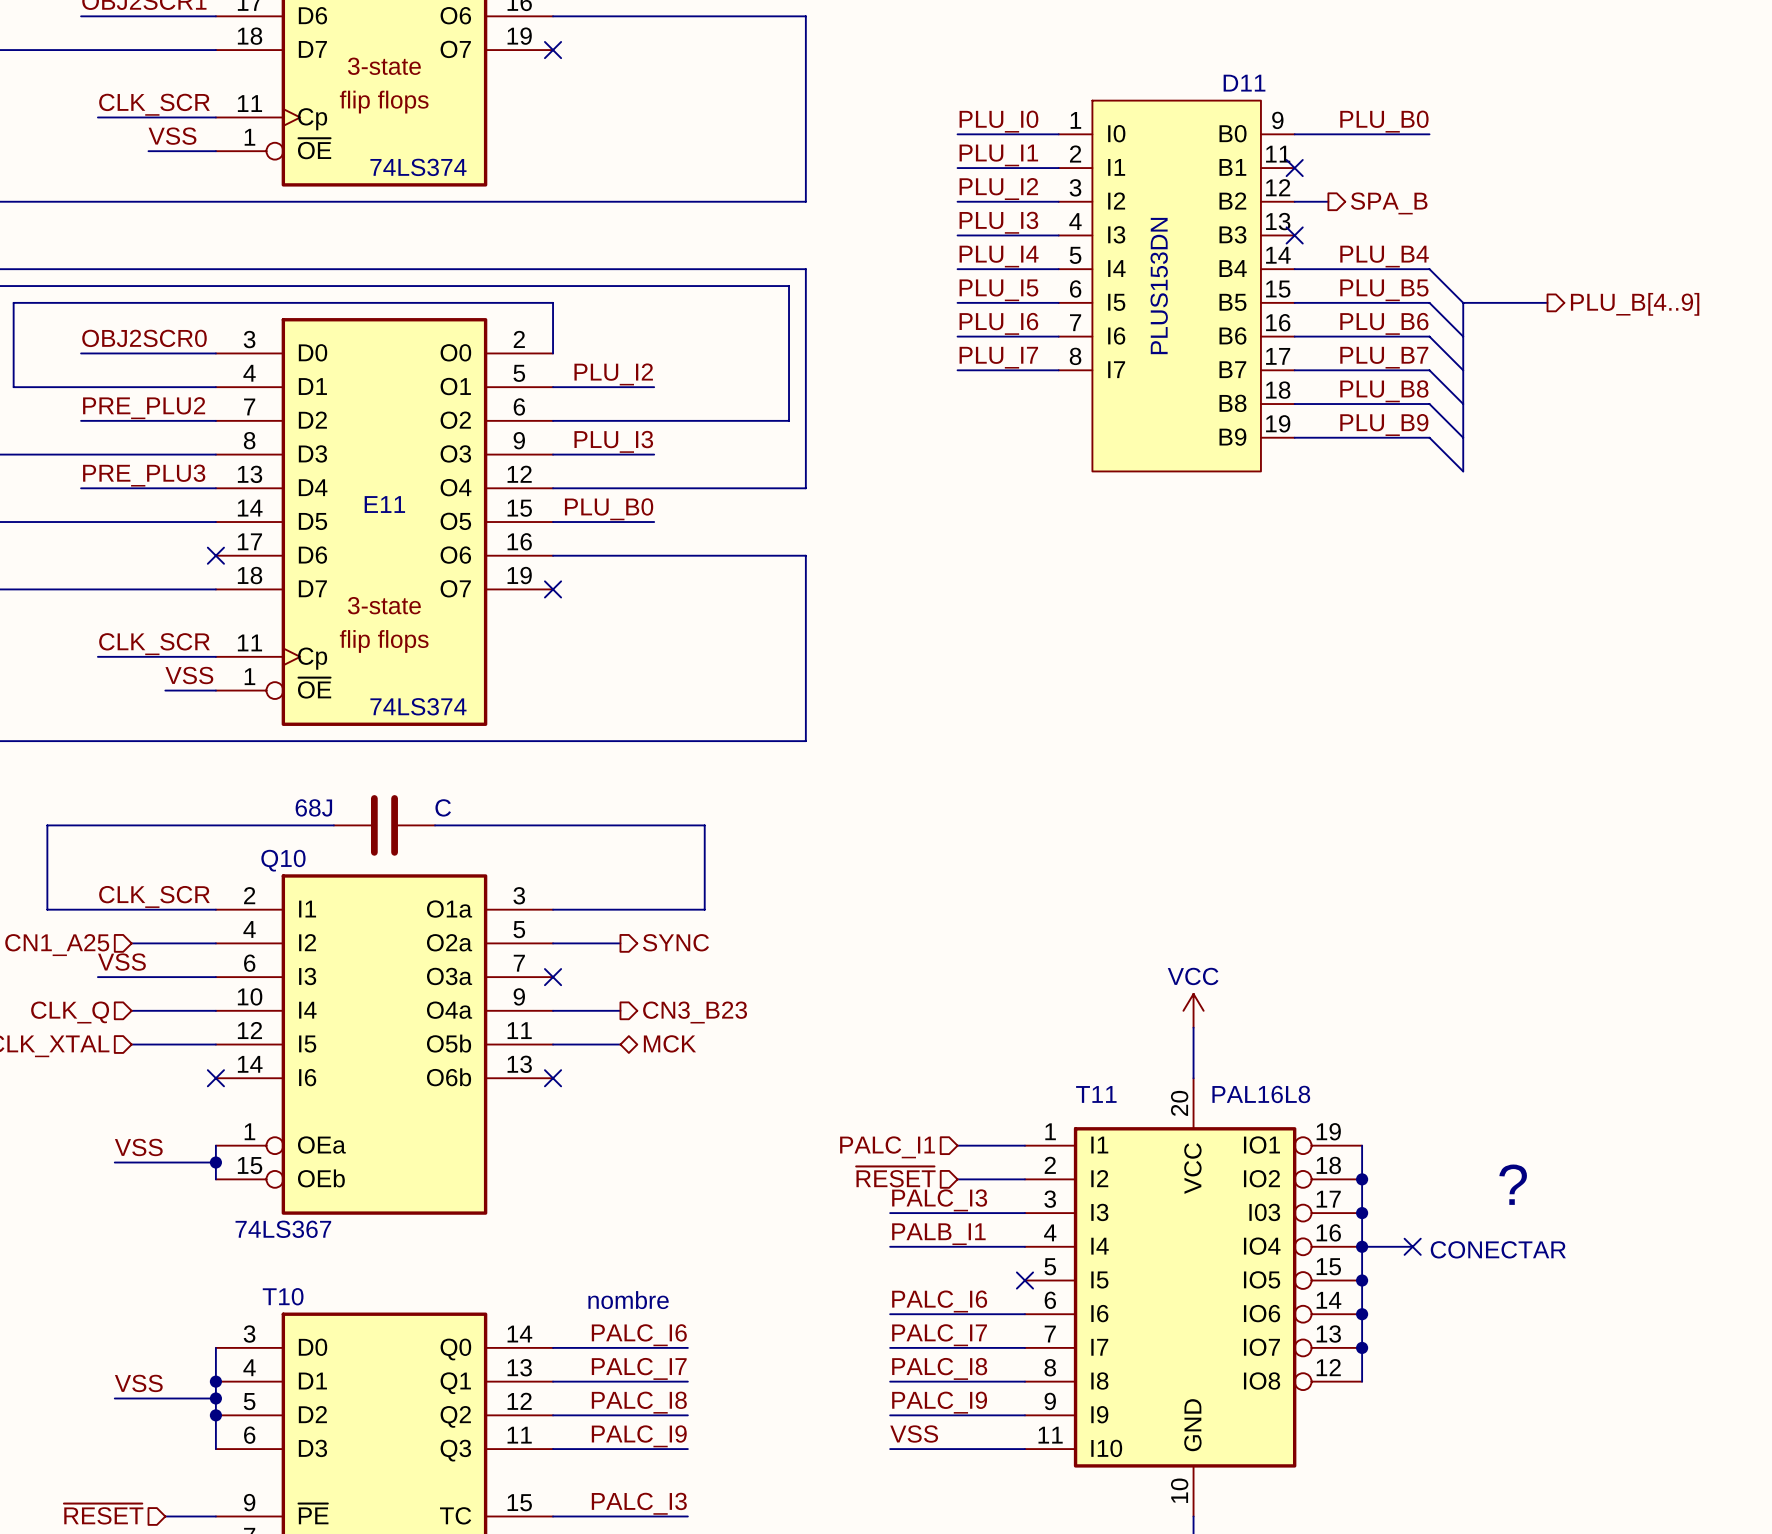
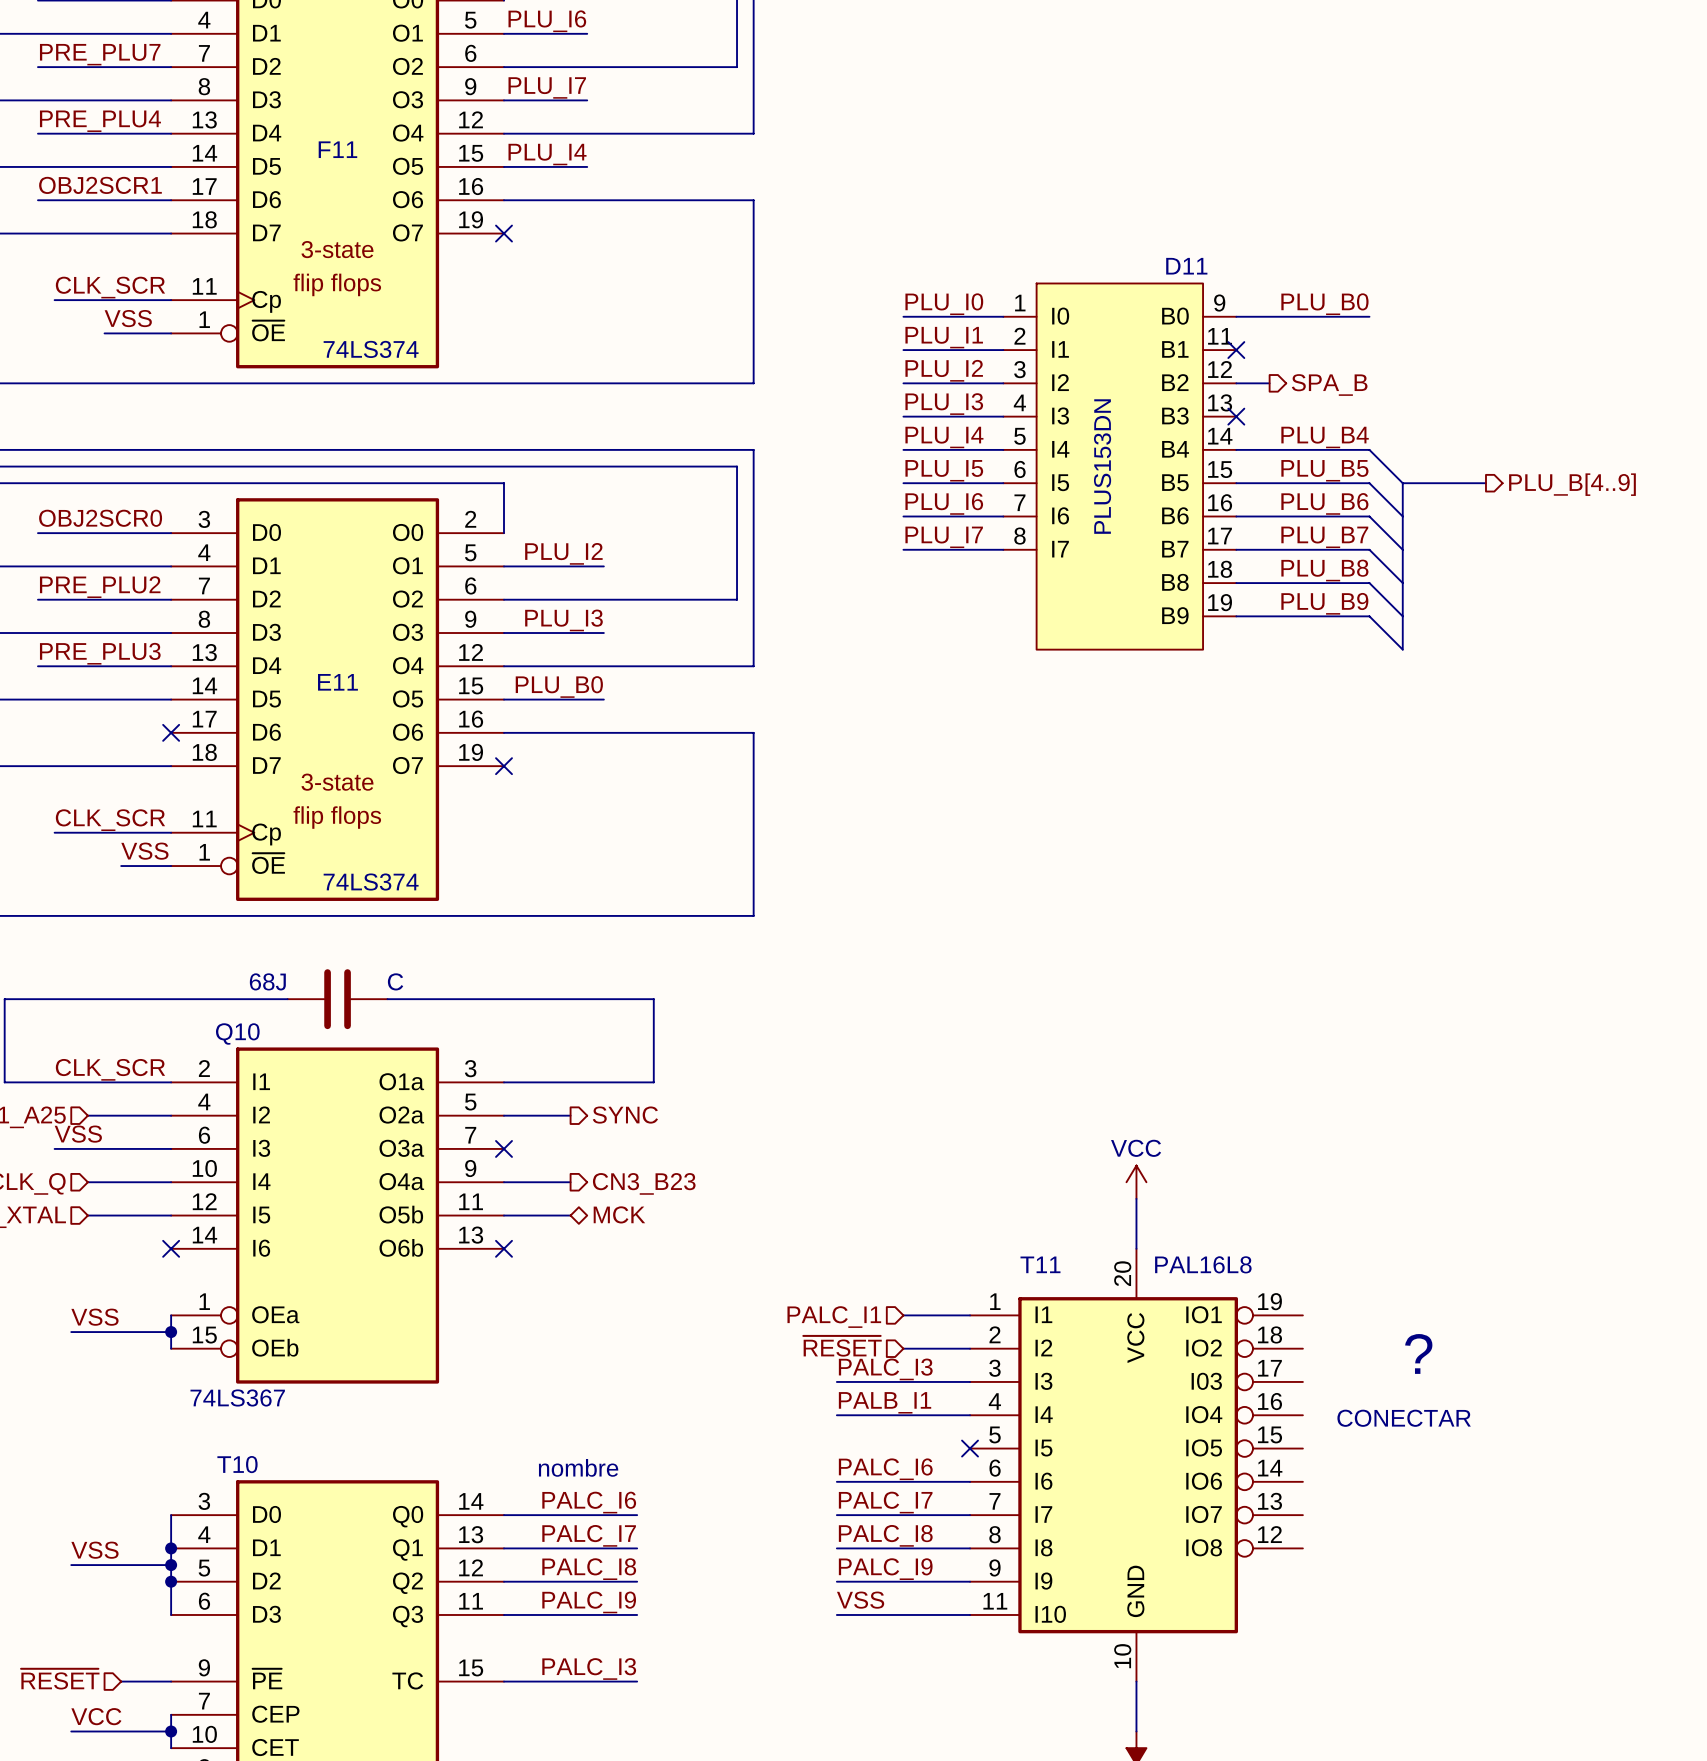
wire: (1362, 1145) (1362, 1381) -> none
junction: (1362, 1179) -> none
text position: ? (1513, 1184) -> ? (1418, 1353)
junction: (1362, 1213) -> none
wire: (1362, 1246) (1412, 1246) -> none
junction: (1362, 1246) -> none
no-connect mark: (1412, 1246) -> none
text position: CONECTAR (1498, 1249) -> CONECTAR (1404, 1418)
junction: (1362, 1280) -> none
junction: (1362, 1314) -> none
junction: (1362, 1347) -> none

